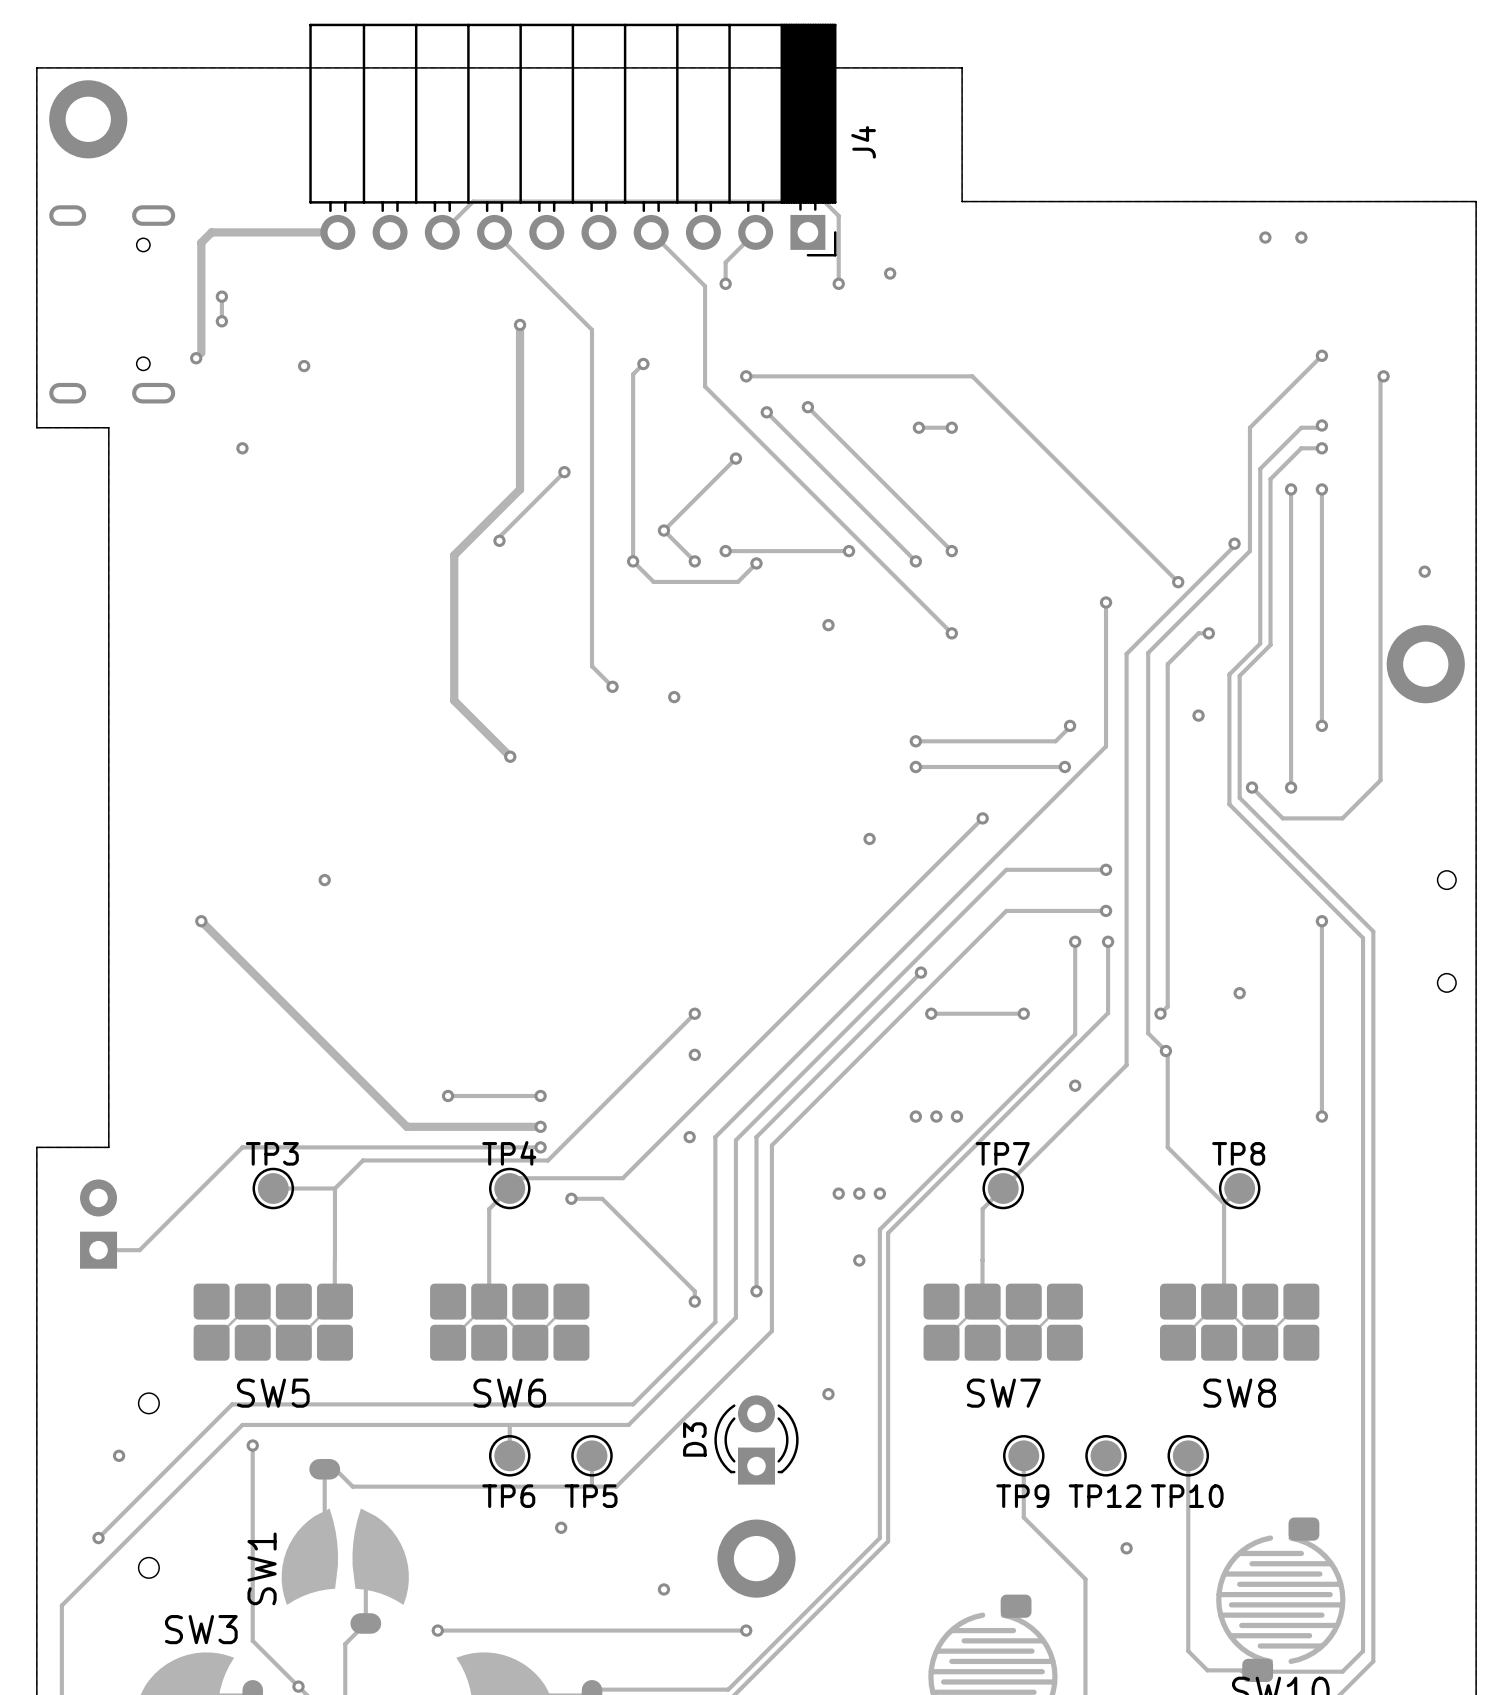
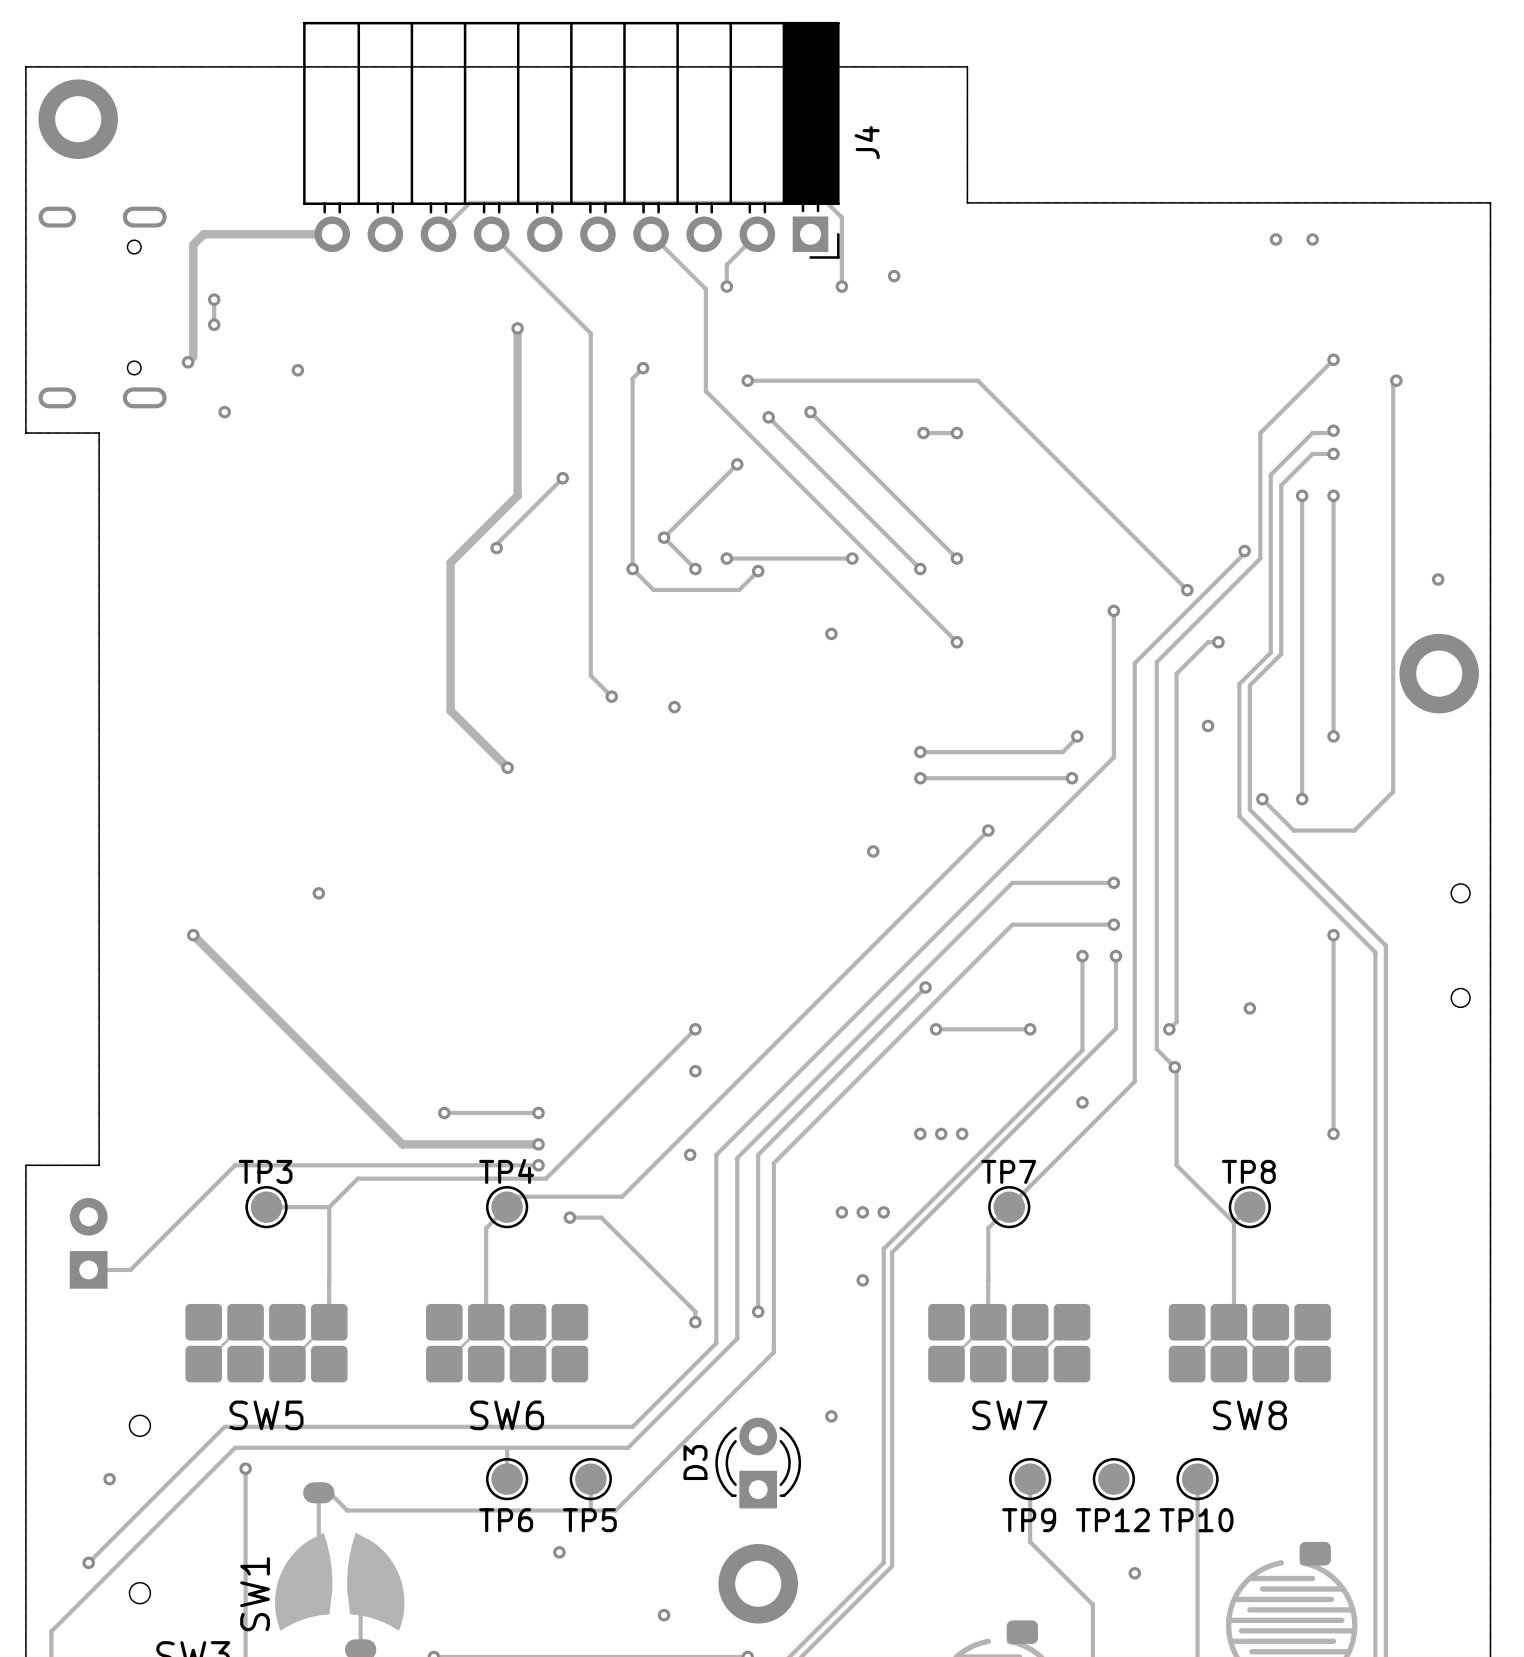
via position: (242, 448) -> (224, 412)

